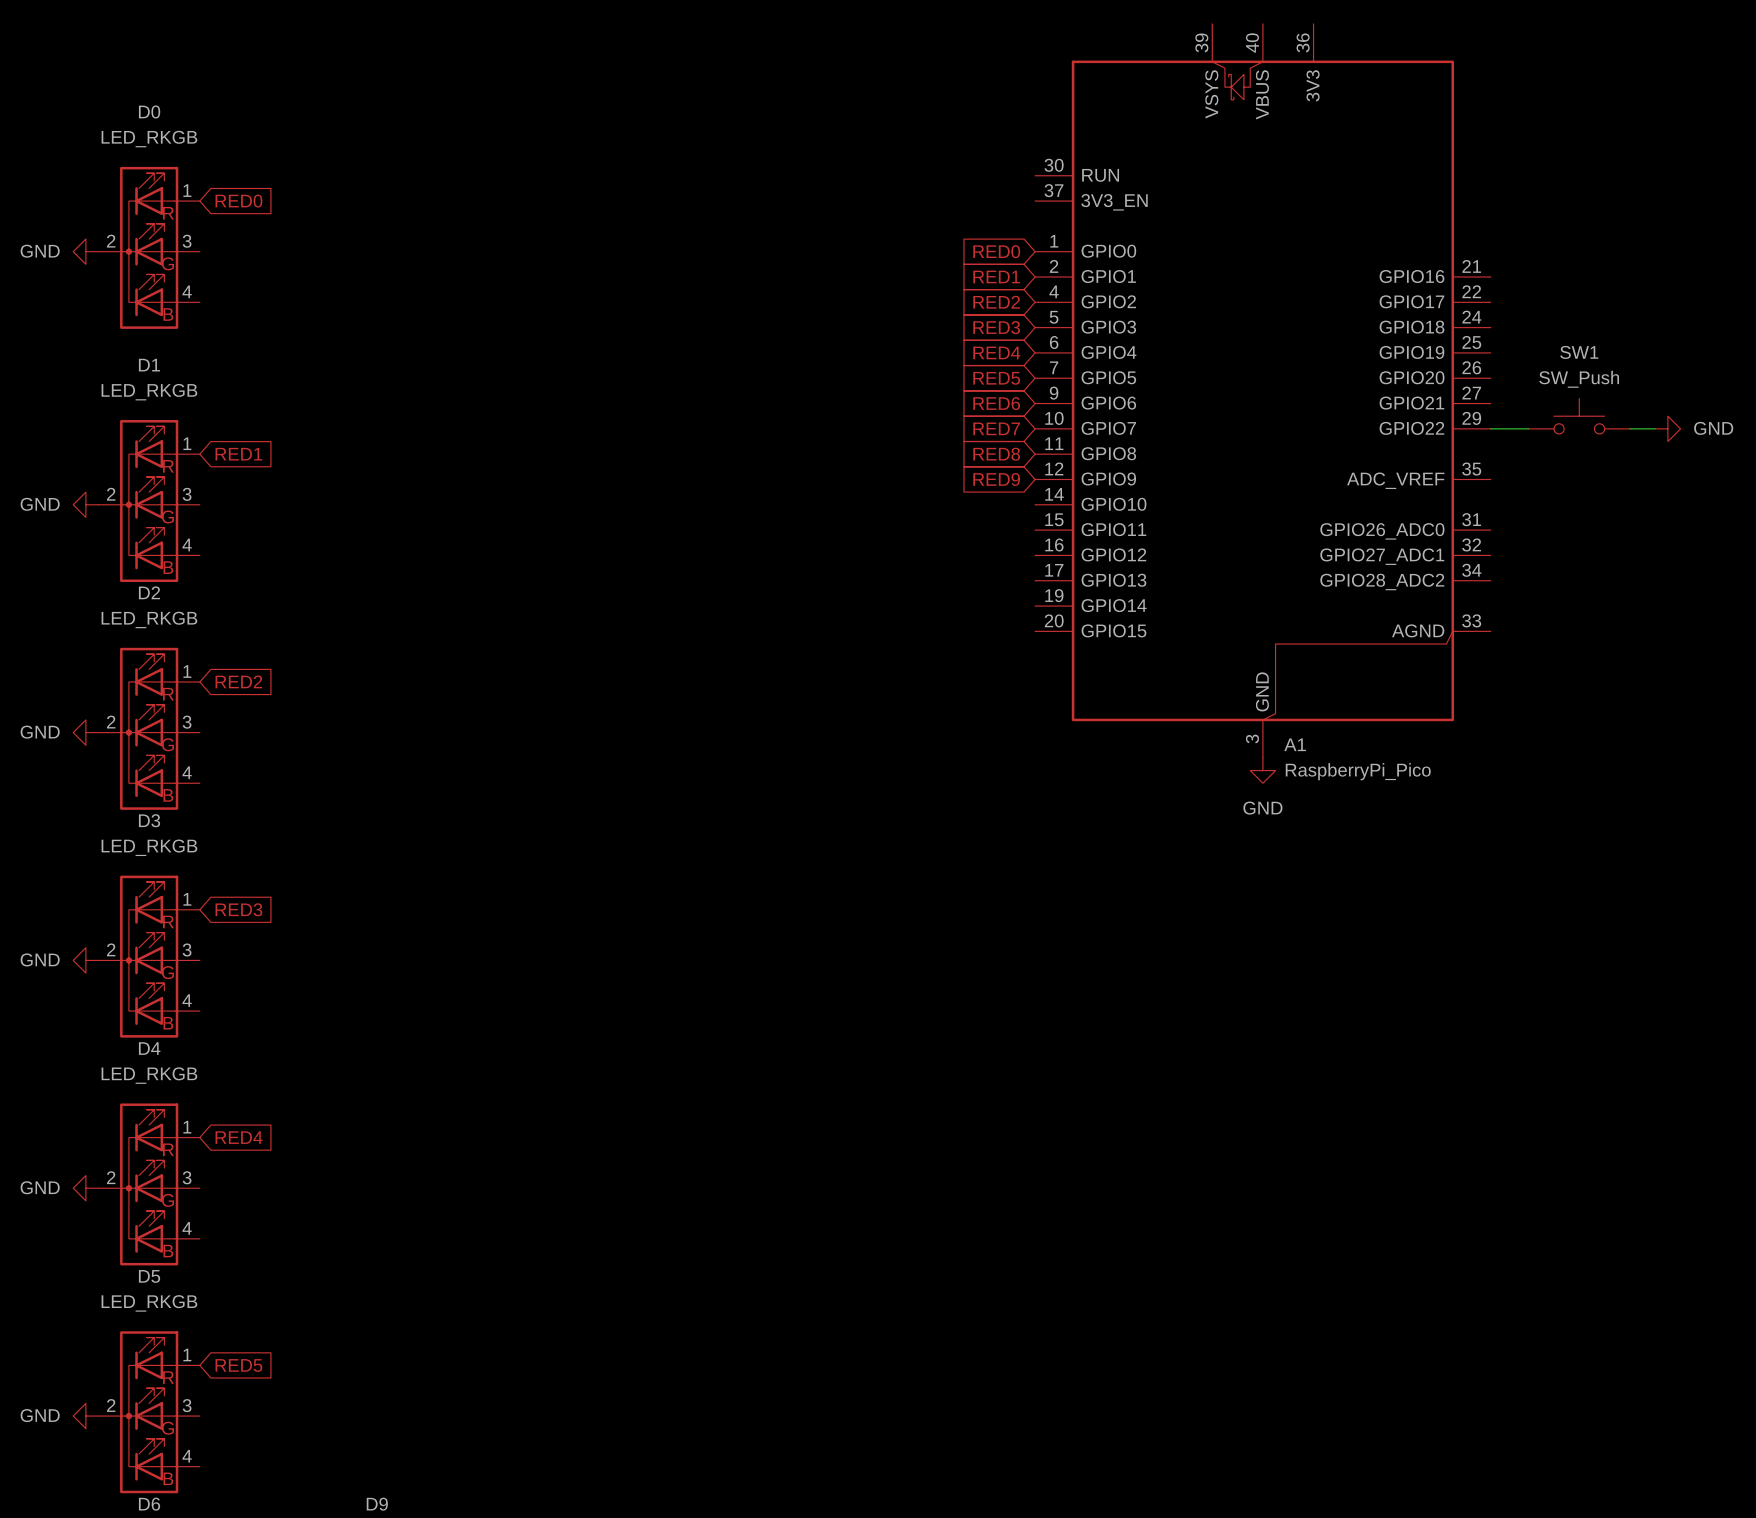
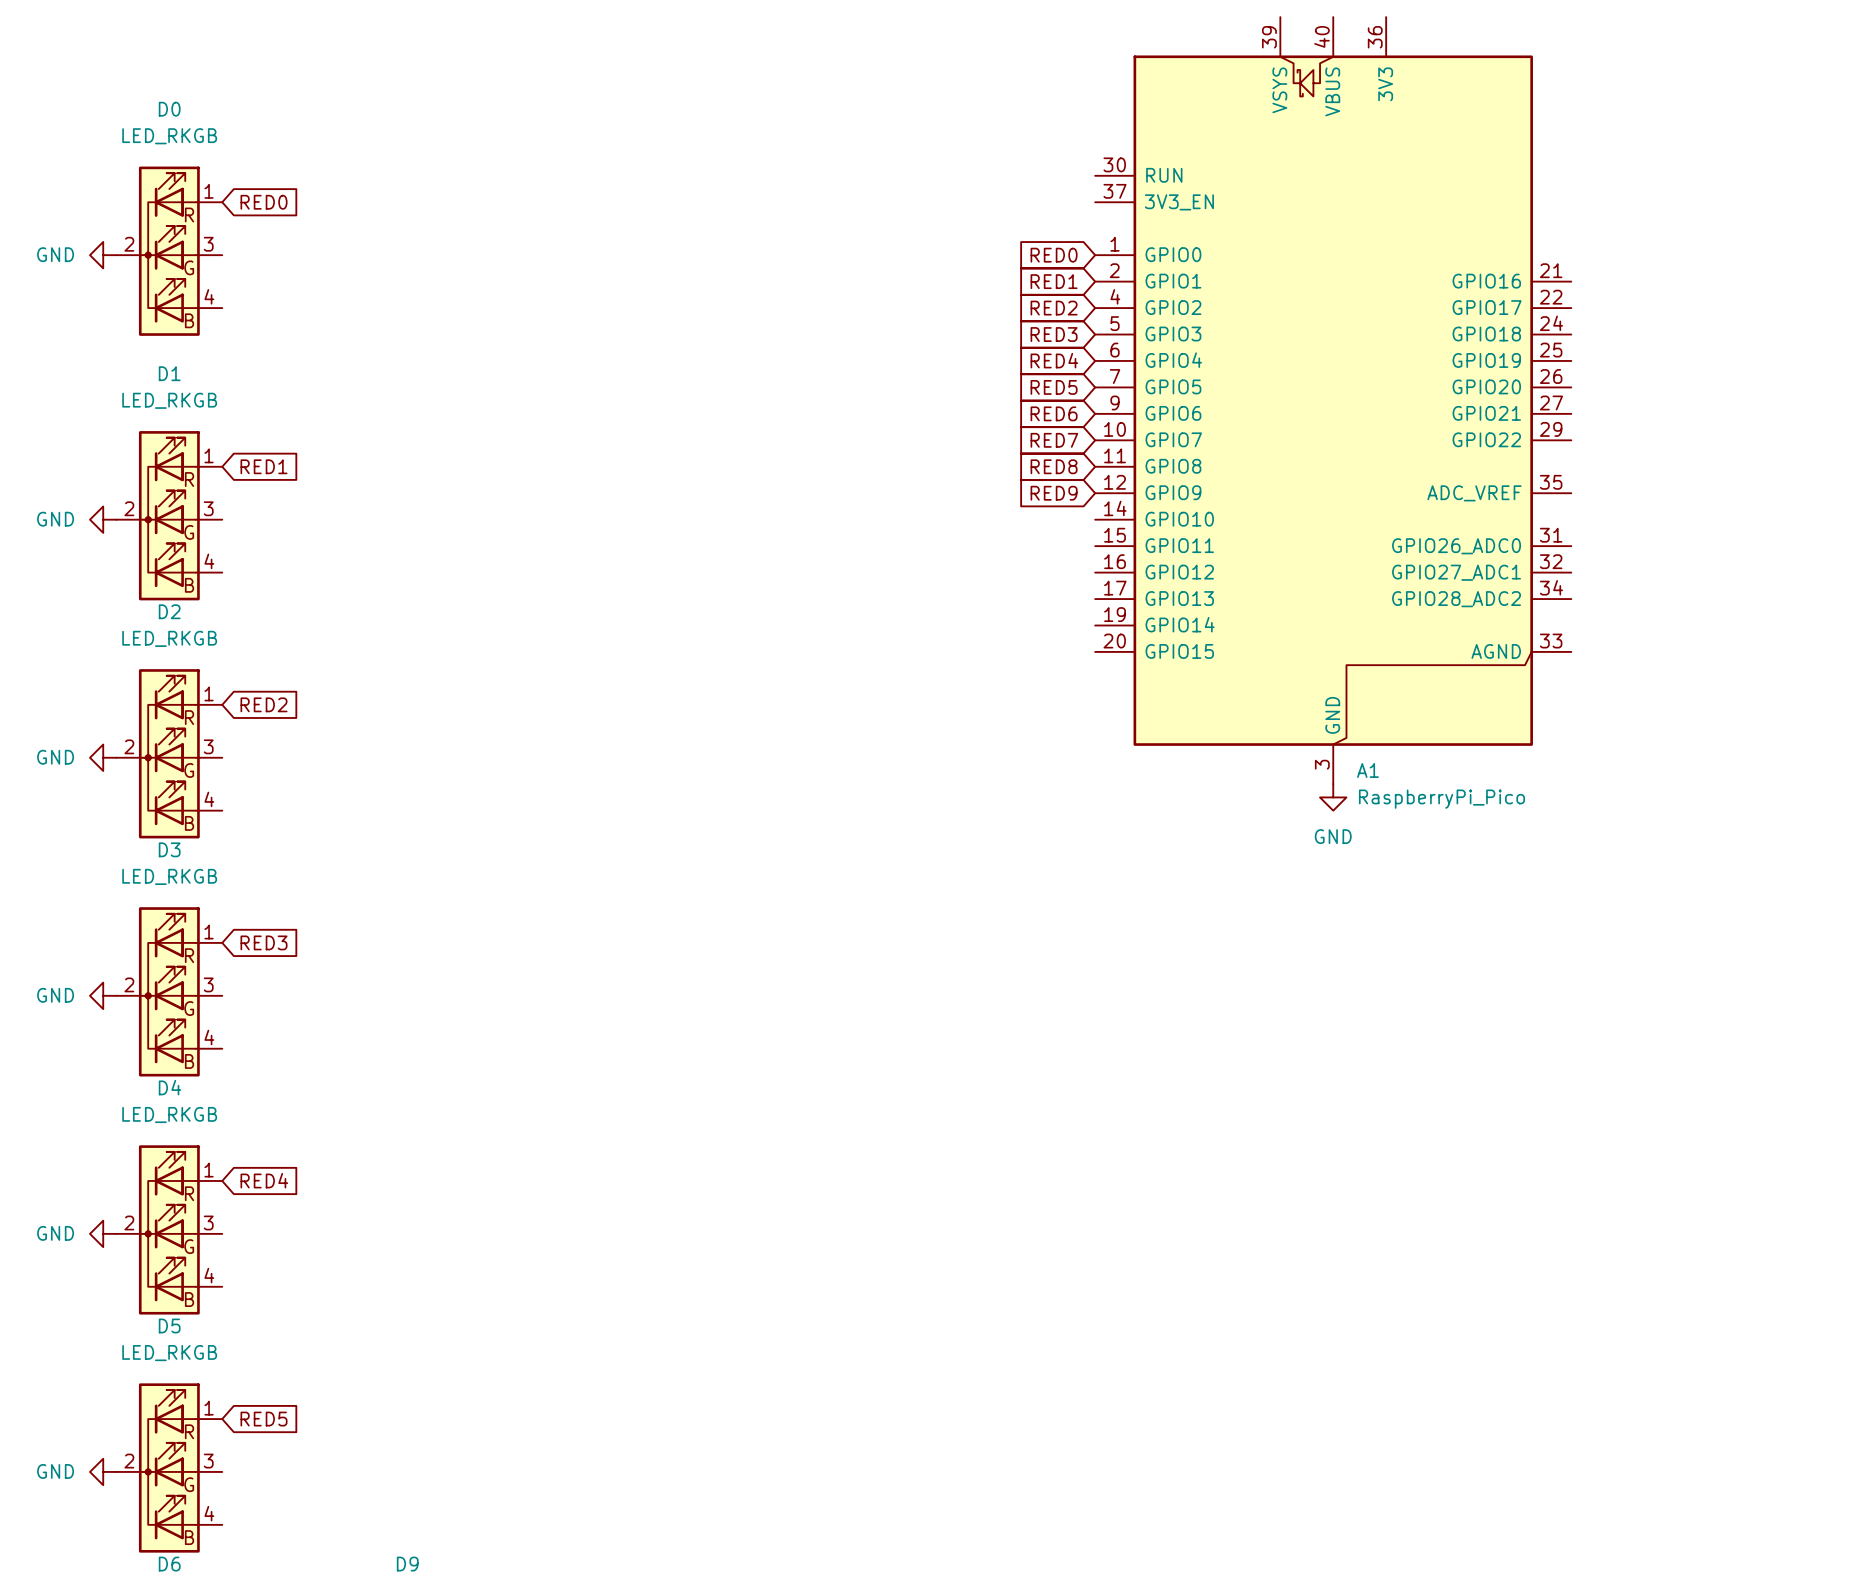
SW1: SW_Push (1579, 416) -> none
wire: (1490, 428) (1528, 428) -> none
wire: (1629, 428) (1655, 428) -> none
power symbol: GND (1667, 428) -> none

